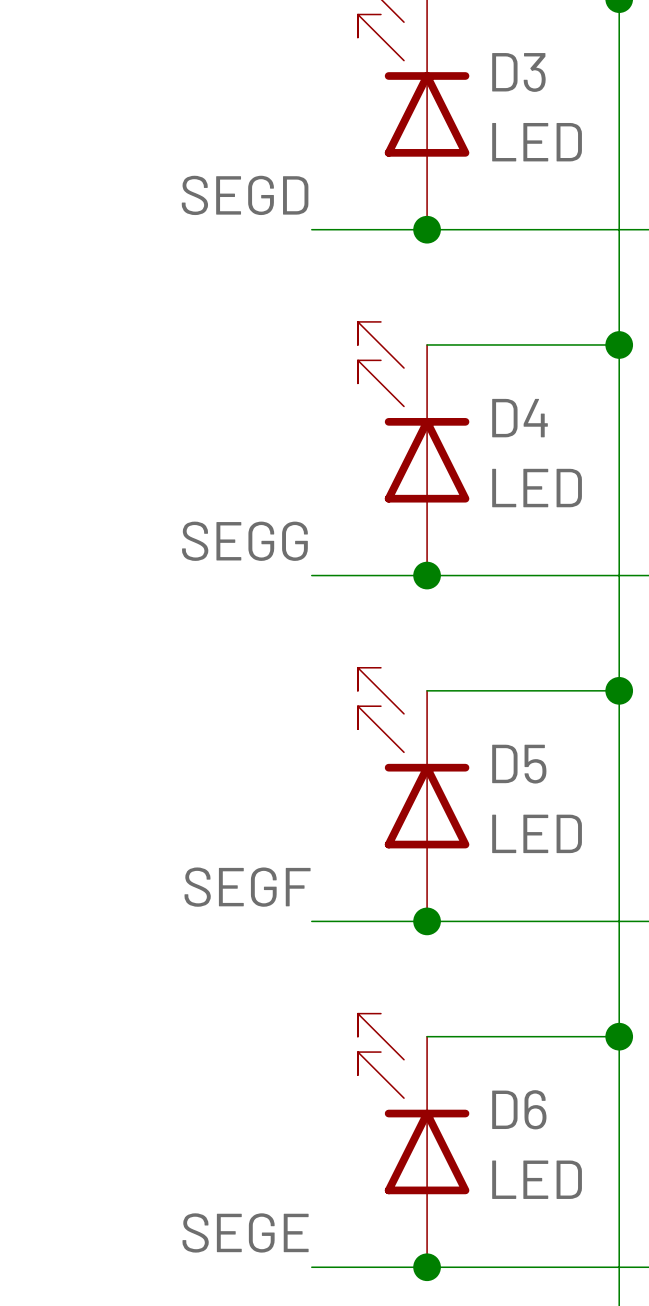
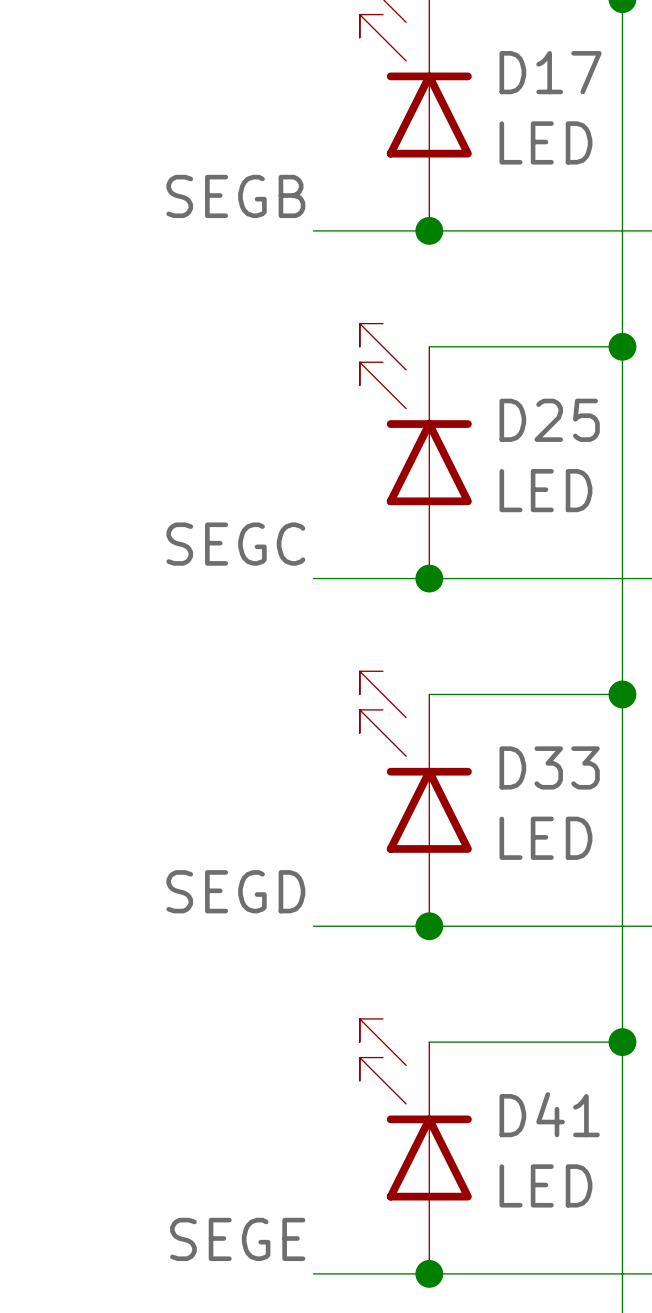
D3 name: D3 (518, 72) -> D17 (550, 72)
label: SEGD (245, 195) -> SEGB (235, 196)
D4 name: D4 (520, 418) -> D25 (549, 420)
label: SEGG (244, 541) -> SEGC (235, 544)
D5 name: D5 (519, 764) -> D33 (549, 767)
label: SEGF (247, 887) -> SEGD (235, 891)
D6 name: D6 (519, 1109) -> D41 (549, 1114)

